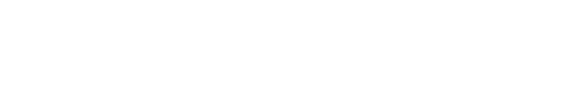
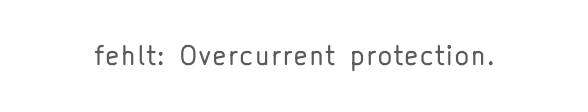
text: none -> fehlt: Overcurrent protection. (293, 58)

